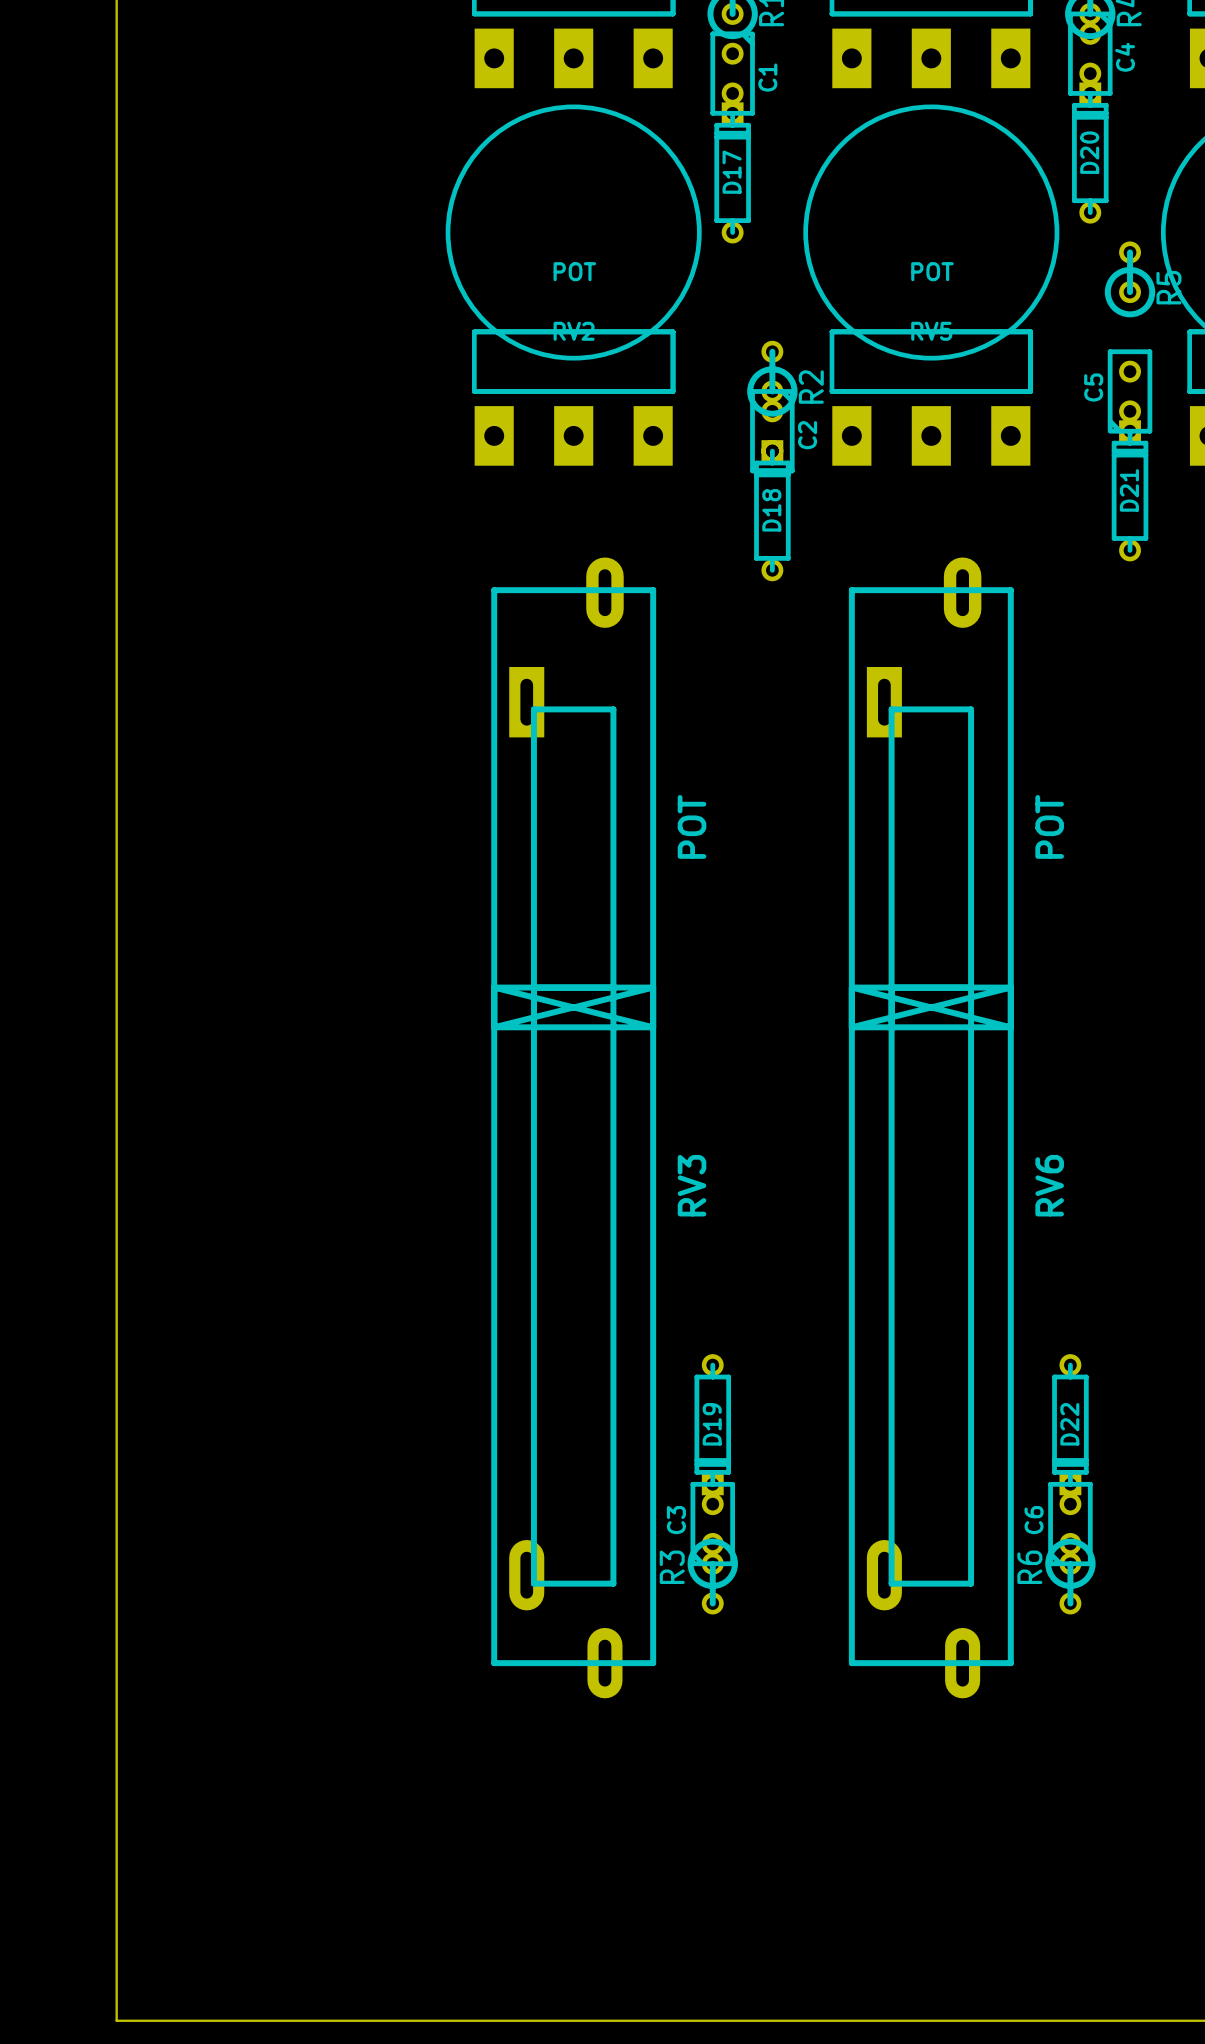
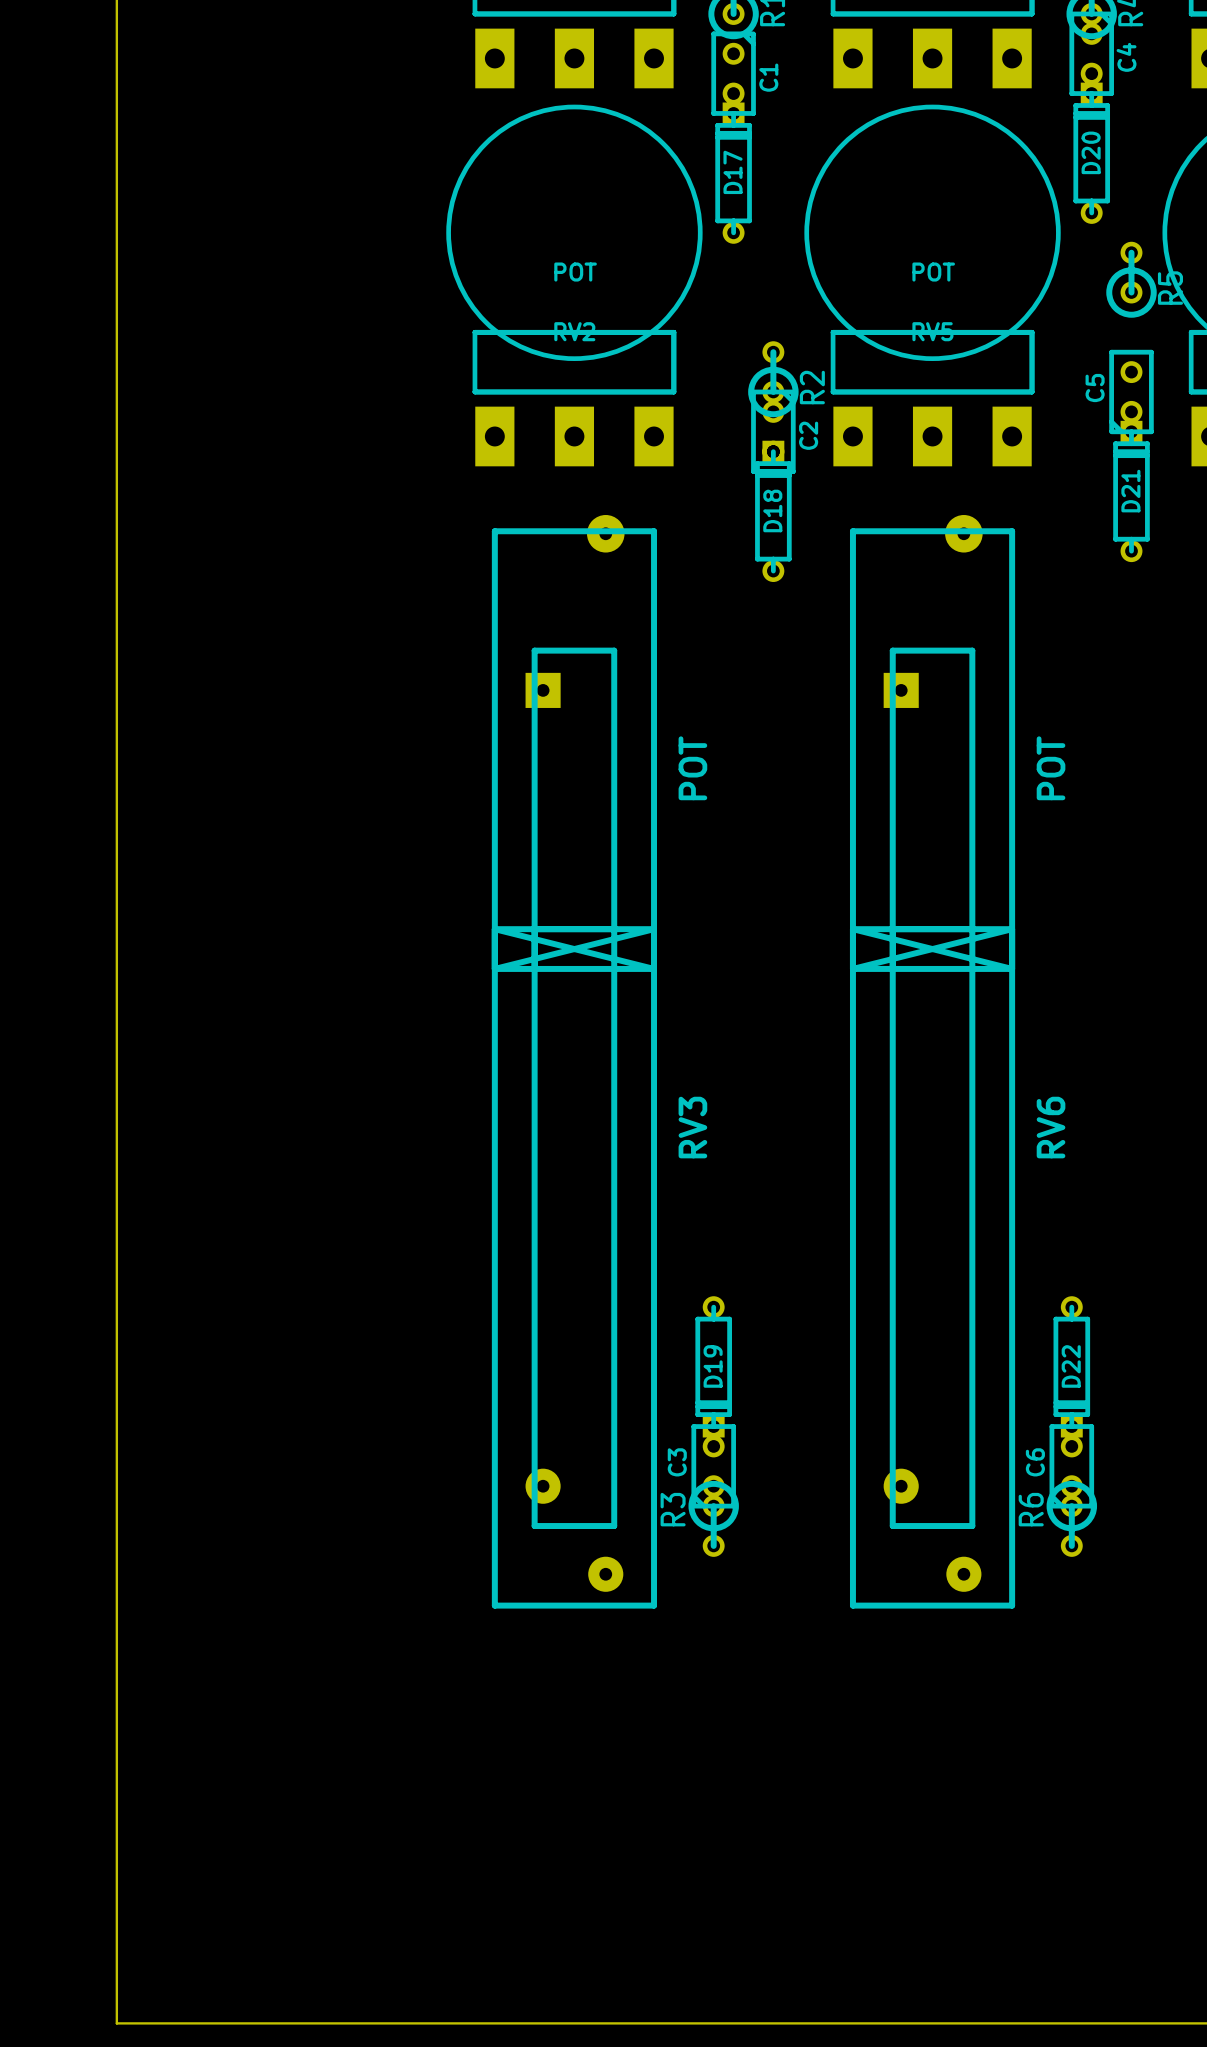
RV3 footprint: [491, 557, 657, 1699] -> [491, 515, 657, 1609]
RV6 footprint: [848, 557, 1014, 1699] -> [849, 515, 1016, 1609]
D19 position: (712, 1424) -> (713, 1366)
D22 position: (1070, 1424) -> (1071, 1366)
C3 position: (712, 1524) -> (713, 1466)
C6 position: (1070, 1524) -> (1071, 1466)
R3 position: (712, 1576) -> (713, 1518)
R6 position: (1070, 1576) -> (1071, 1518)

